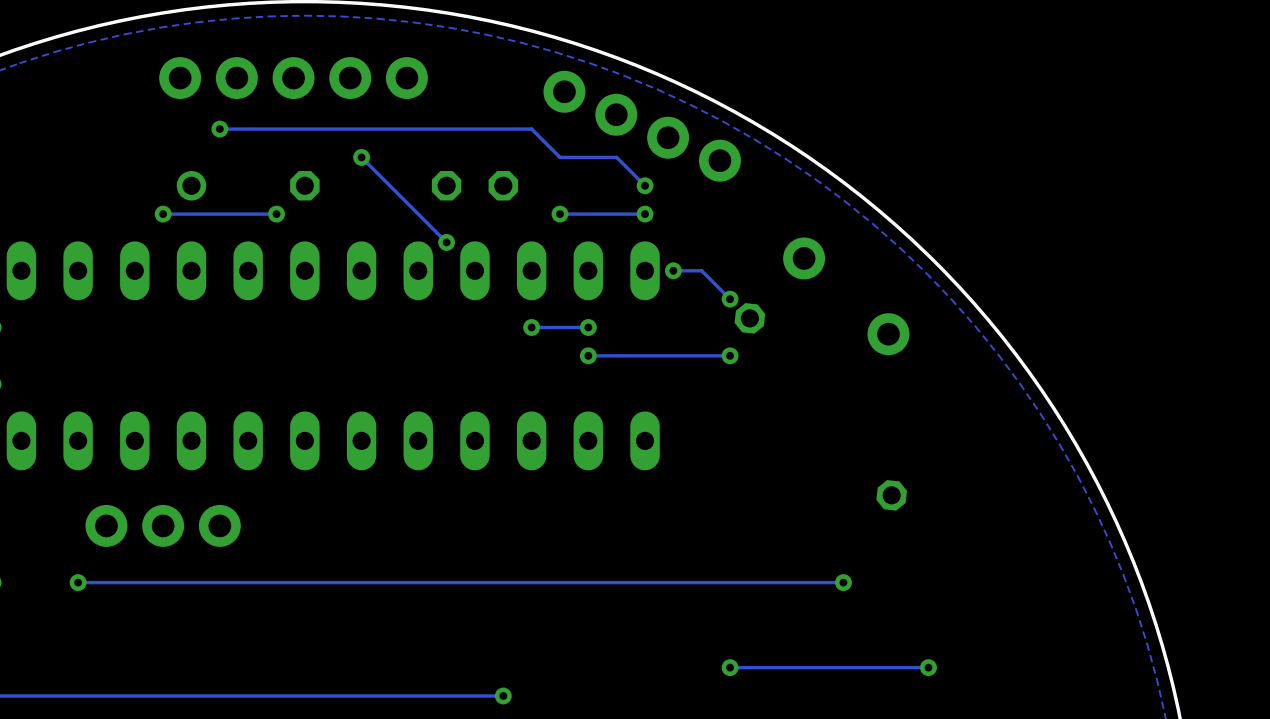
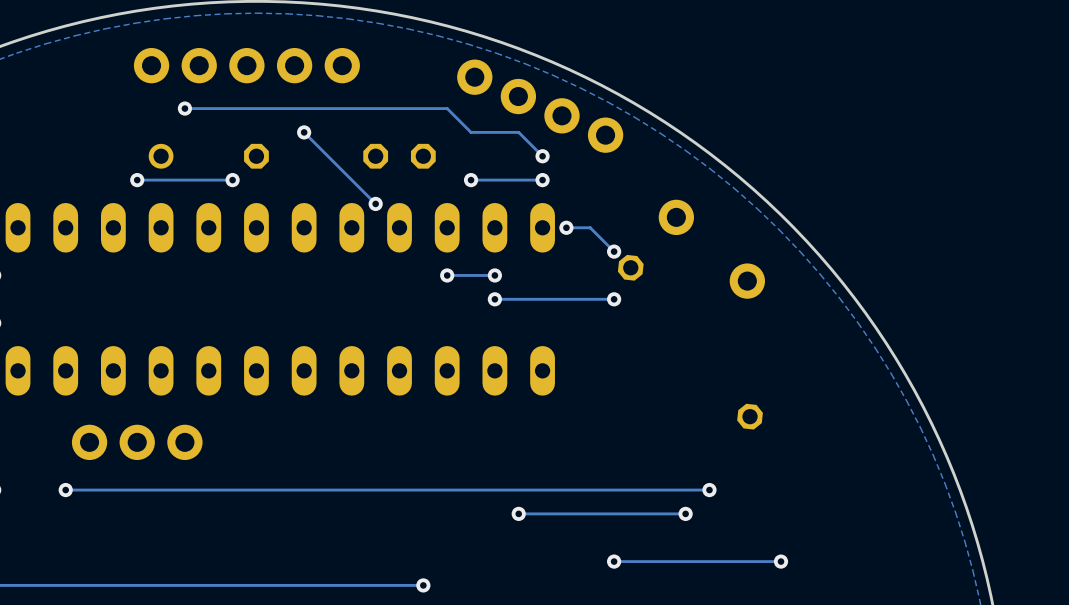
via: none -> (518, 513)
track: none -> (685, 513) (518, 513)
via: none -> (685, 513)

